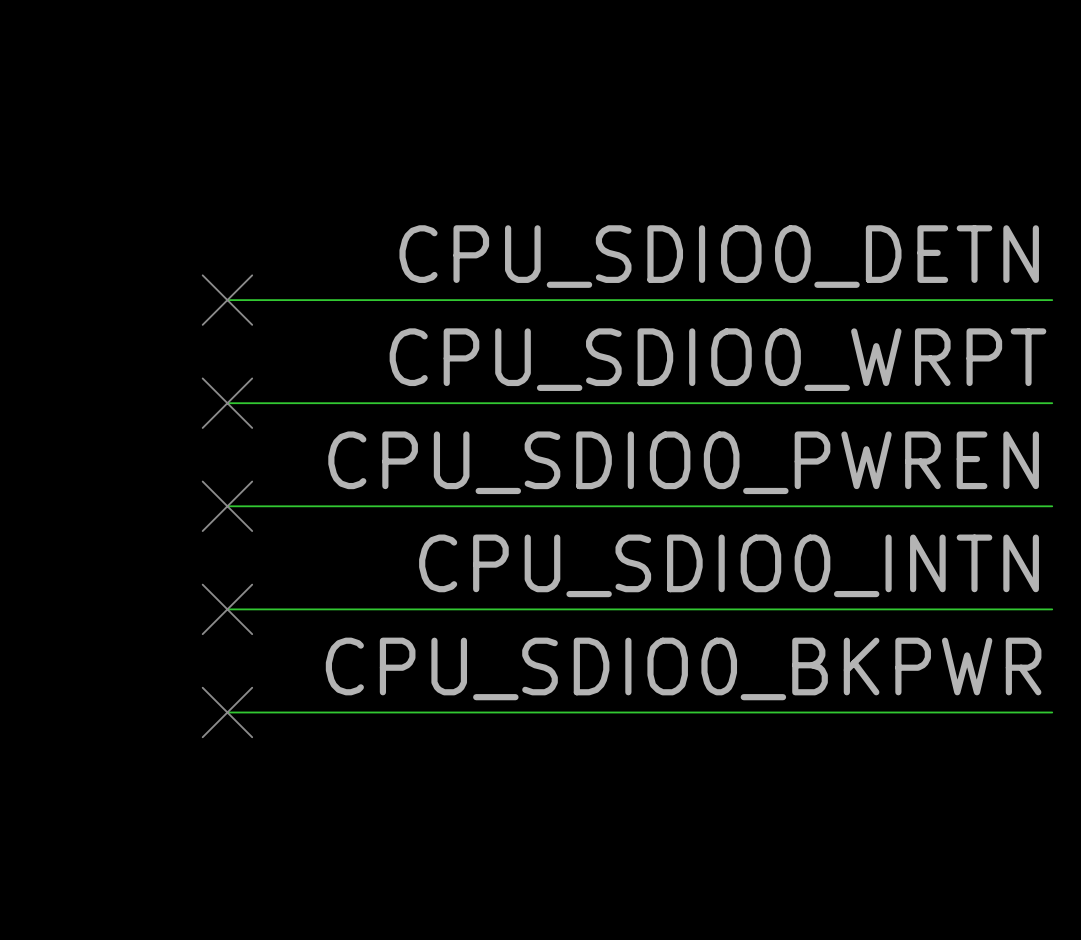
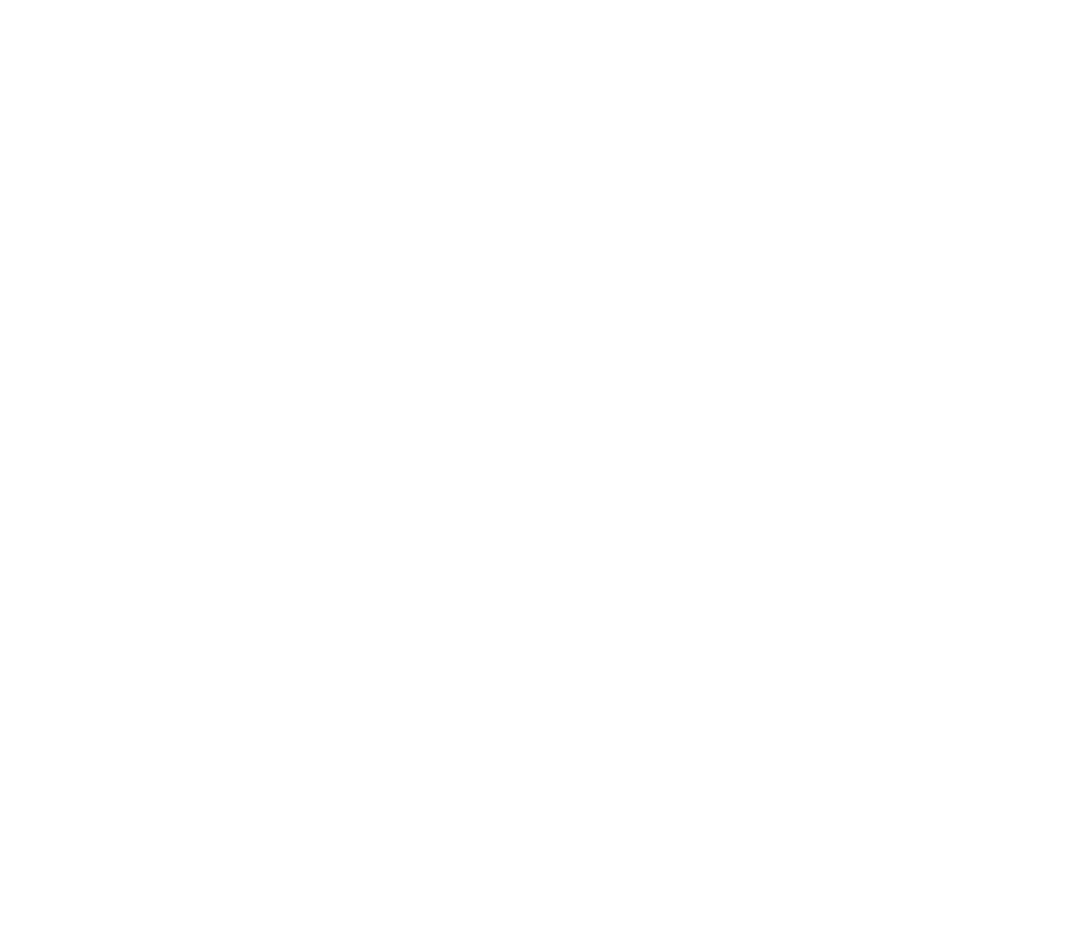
label: CPU_SDIO0_DETN (719, 256) -> none
wire: (227, 300) (1052, 300) -> none
no-connect mark: (227, 300) -> none
label: CPU_SDIO0_WRPT (717, 359) -> none
wire: (227, 403) (1052, 403) -> none
no-connect mark: (227, 403) -> none
label: CPU_SDIO0_PWREN (683, 462) -> none
wire: (227, 506) (1052, 506) -> none
no-connect mark: (227, 506) -> none
label: CPU_SDIO0_INTN (729, 565) -> none
wire: (227, 609) (1052, 609) -> none
no-connect mark: (227, 609) -> none
label: CPU_SDIO0_BKPWR (683, 668) -> none
wire: (227, 712) (1052, 712) -> none
no-connect mark: (227, 712) -> none

